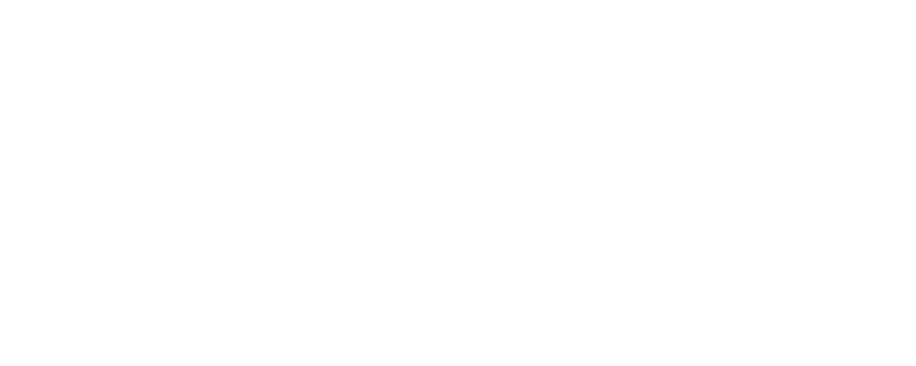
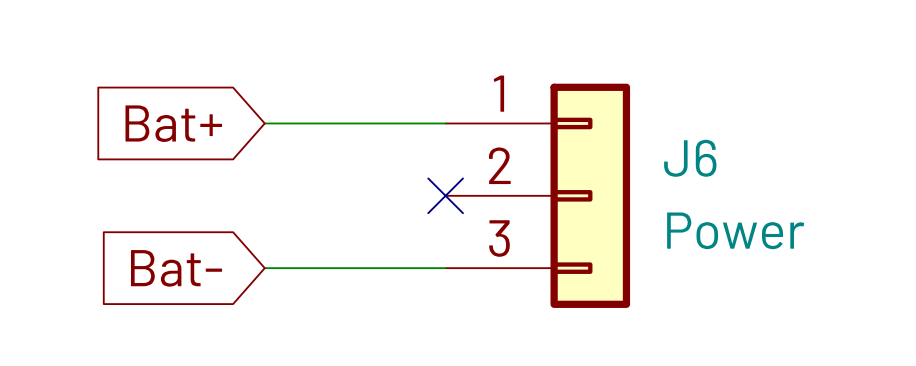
global label: none -> Bat+ (173, 123)
wire: none -> (264, 123) (445, 123)
no-connect mark: none -> (445, 195)
J6: none -> Power (537, 195)
global label: none -> Bat- (176, 268)
wire: none -> (264, 268) (445, 268)

